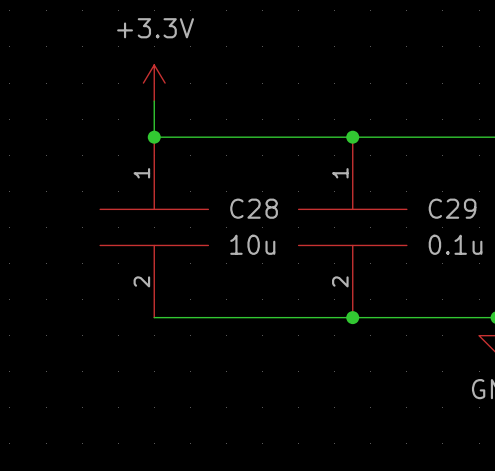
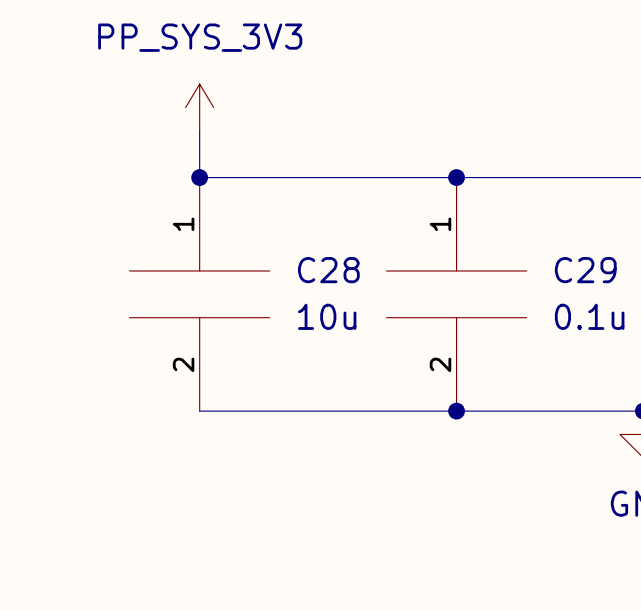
power symbol: +3.3V (154, 83) -> PP_SYS_3V3 (199, 107)

